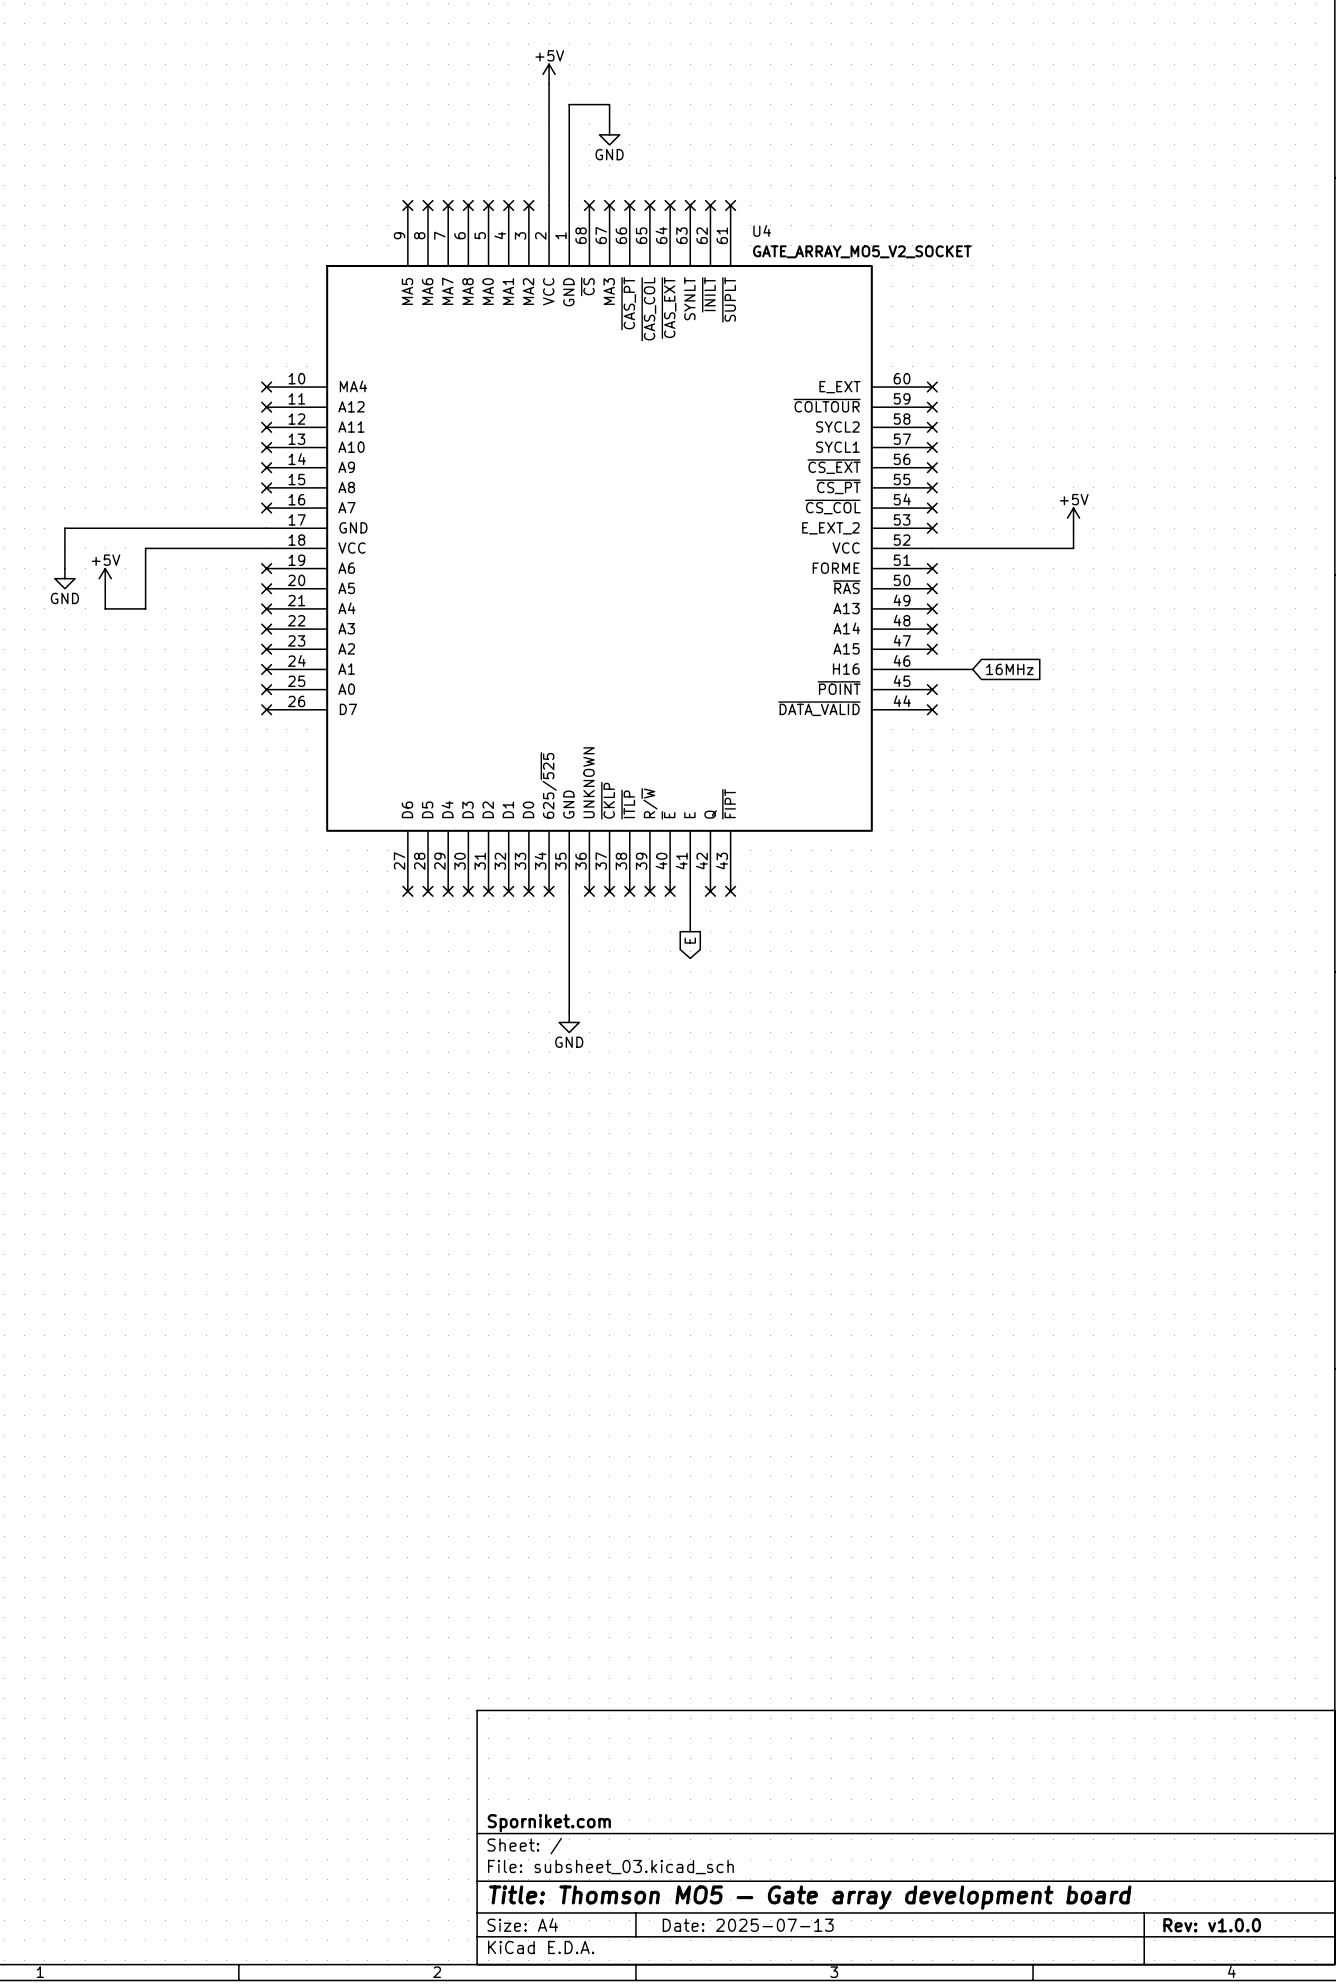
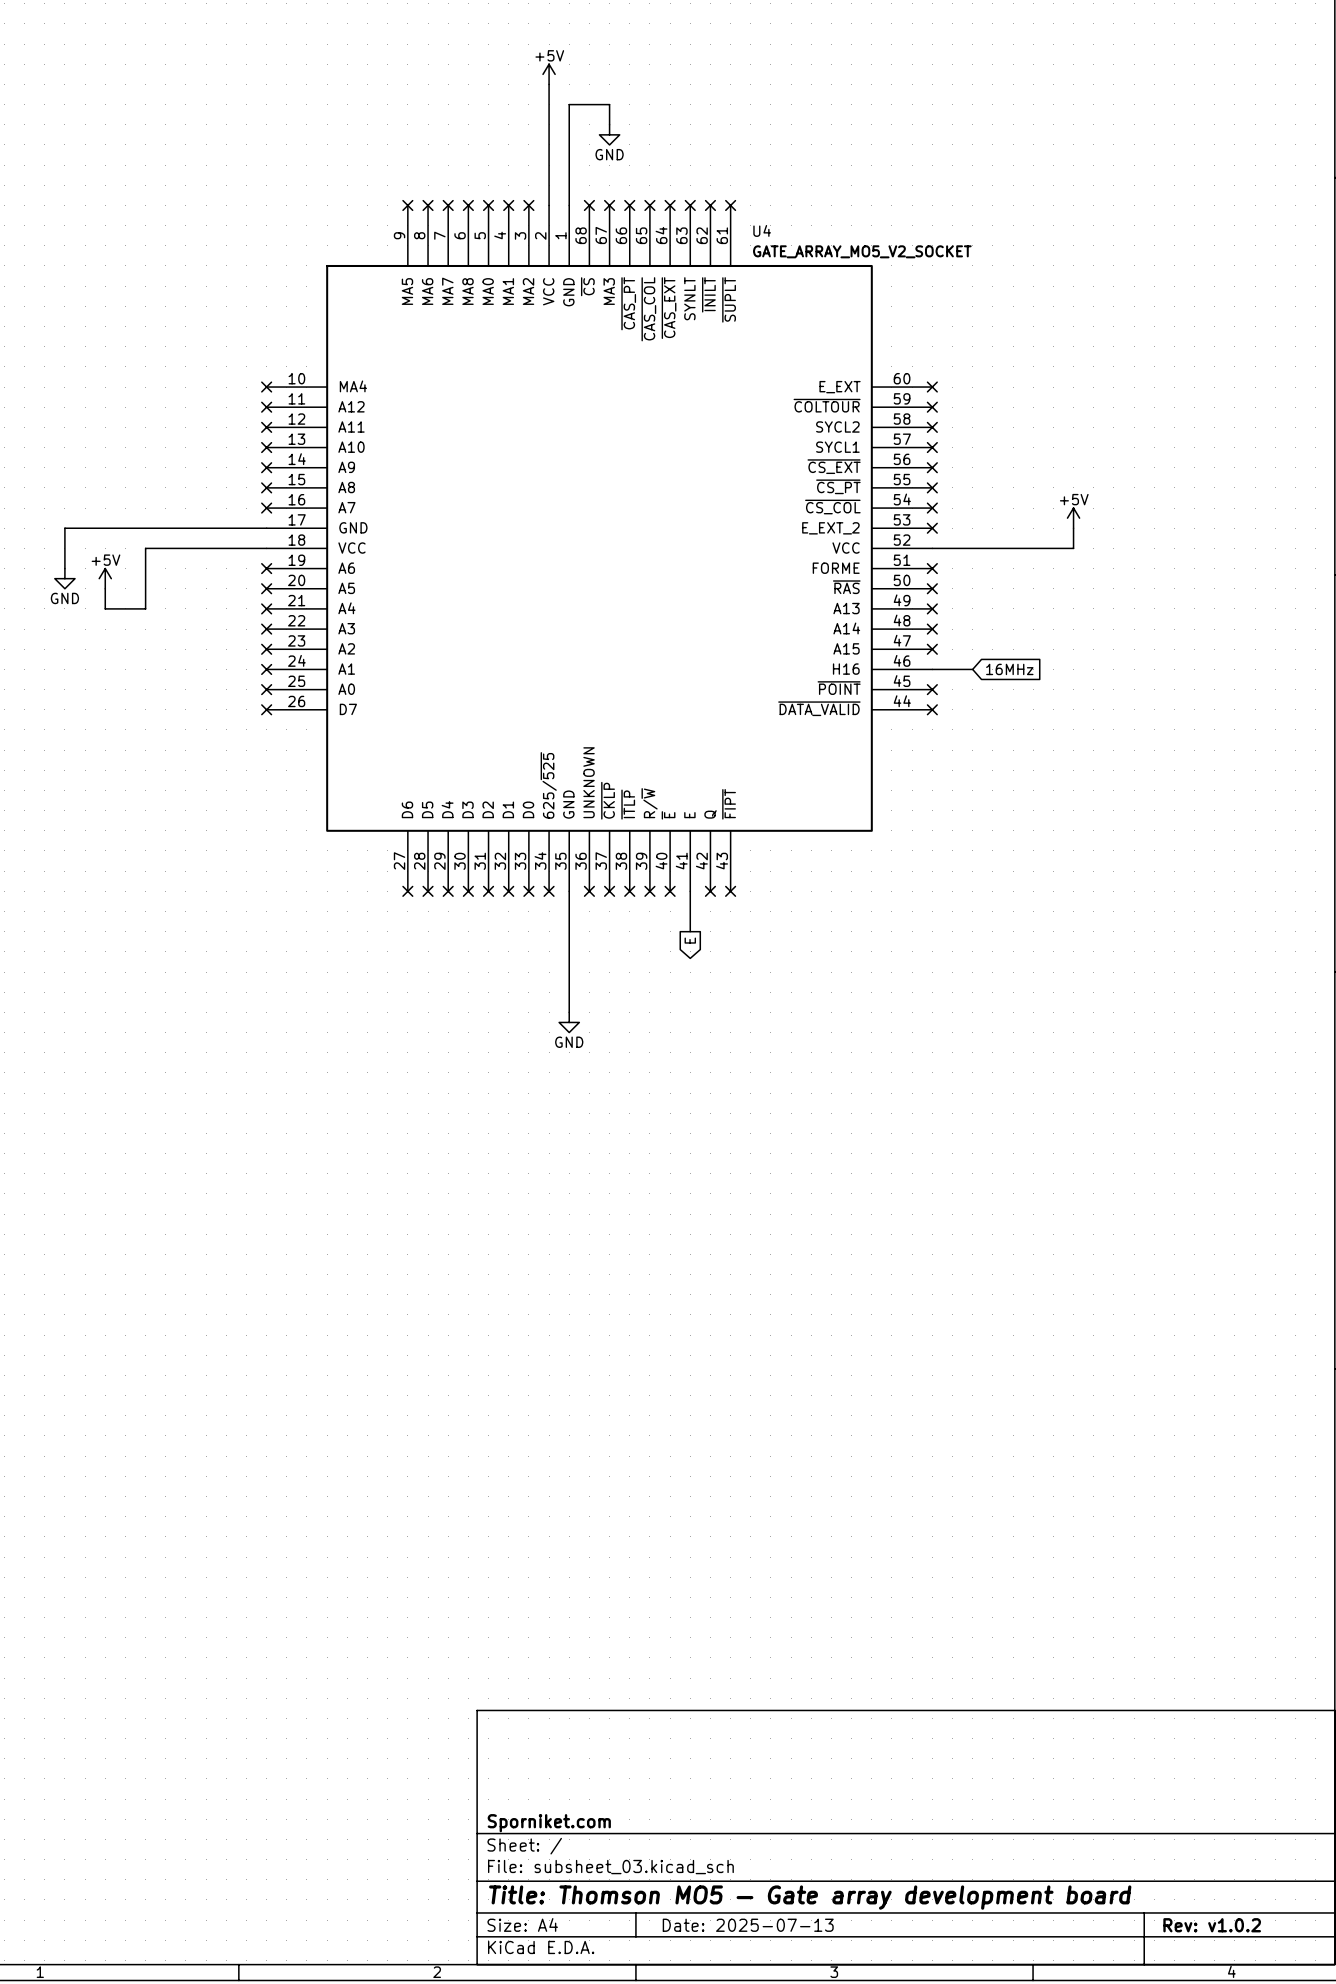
title block: Rev: v1.0.0 (1212, 1925) -> Rev: v1.0.2 (1212, 1925)

